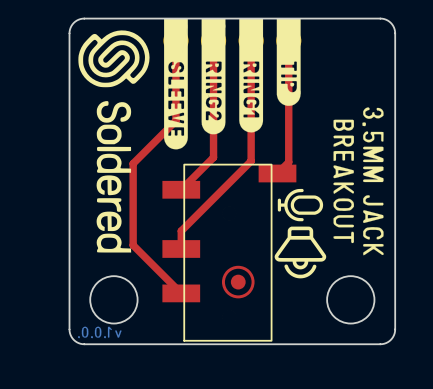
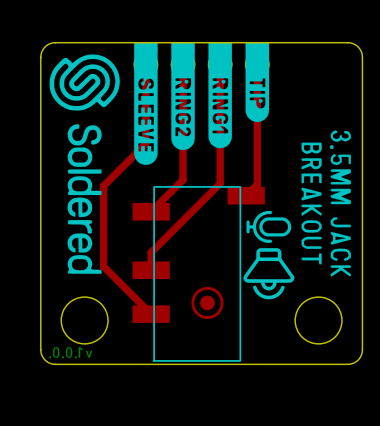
drawing shape: [164, 18, 188, 150] -> [134, 42, 158, 165]
drawing shape: [201, 18, 226, 135] -> [171, 42, 195, 151]
drawing shape: [239, 18, 264, 133] -> [208, 42, 232, 149]
drawing shape: [276, 18, 301, 106] -> [245, 42, 270, 123]

